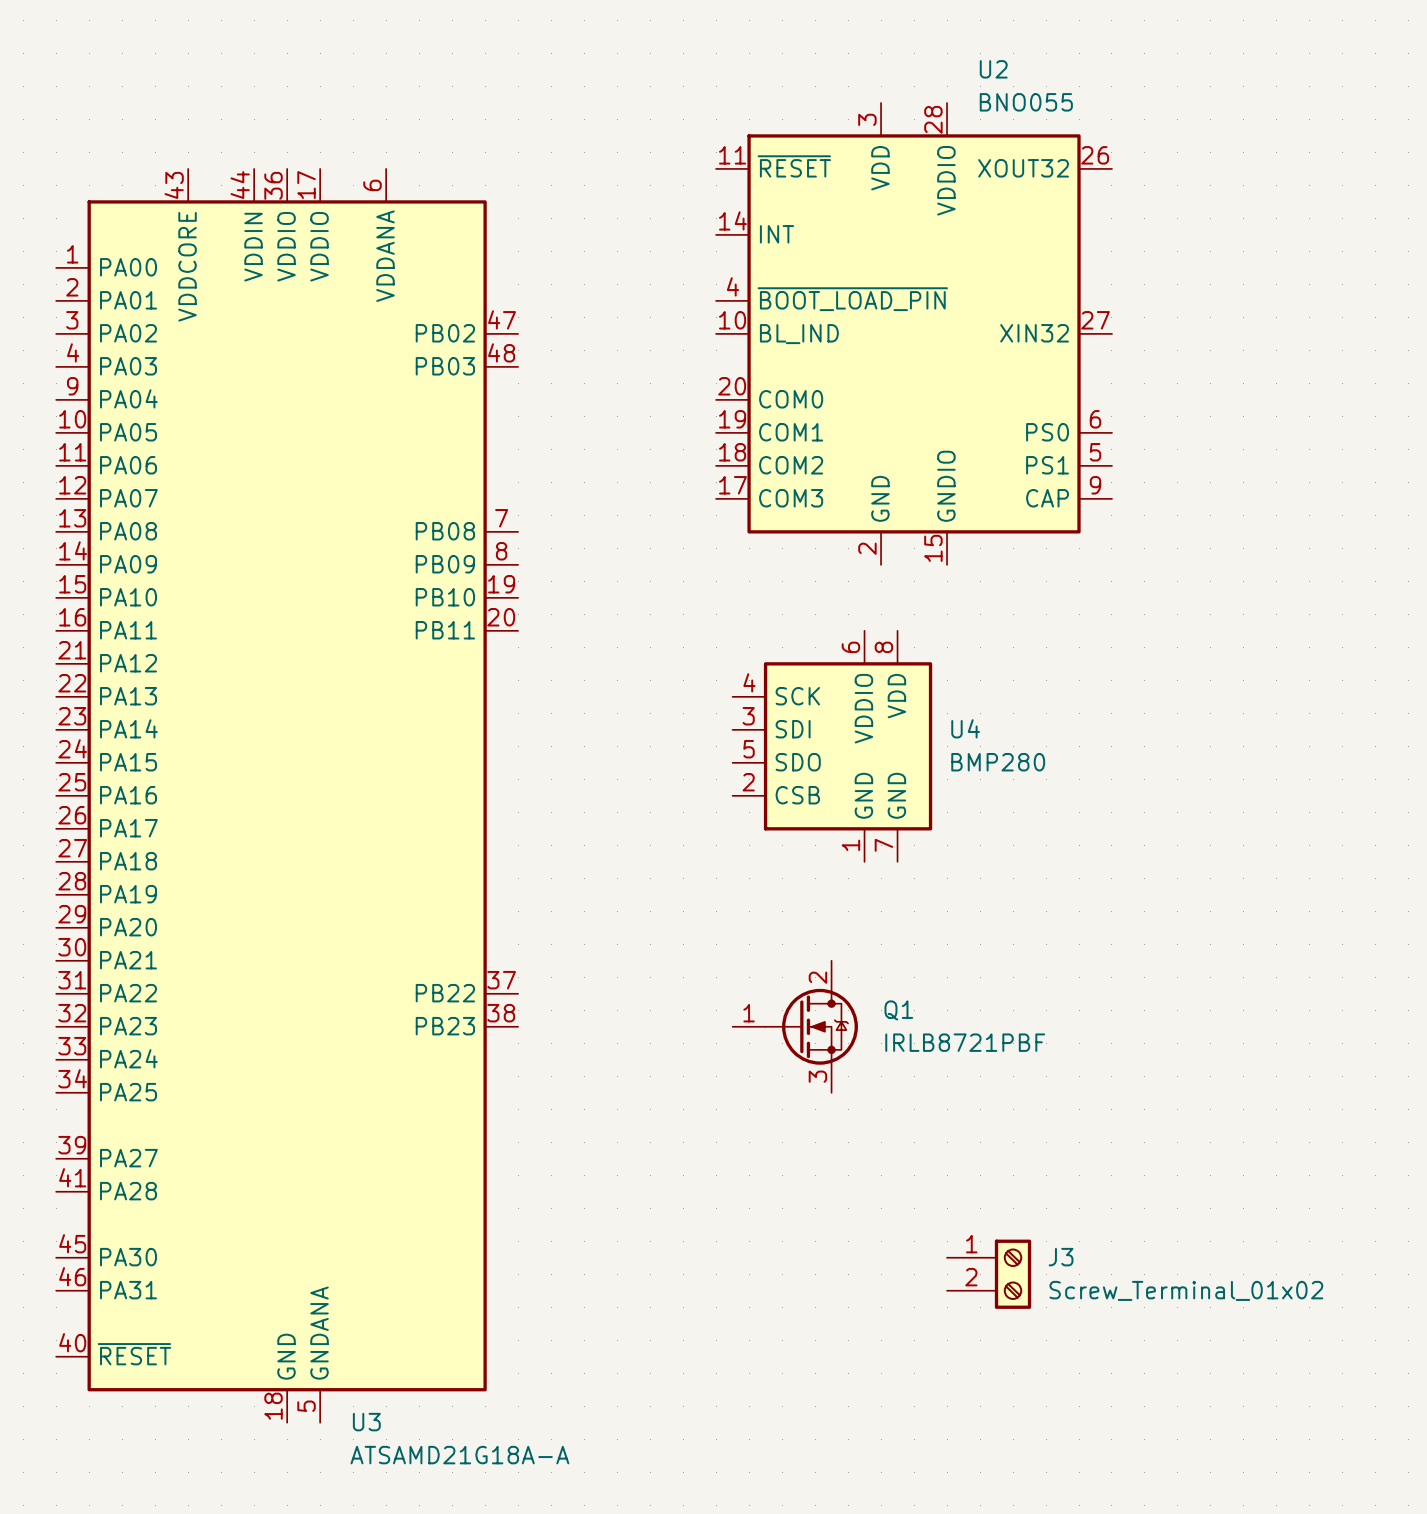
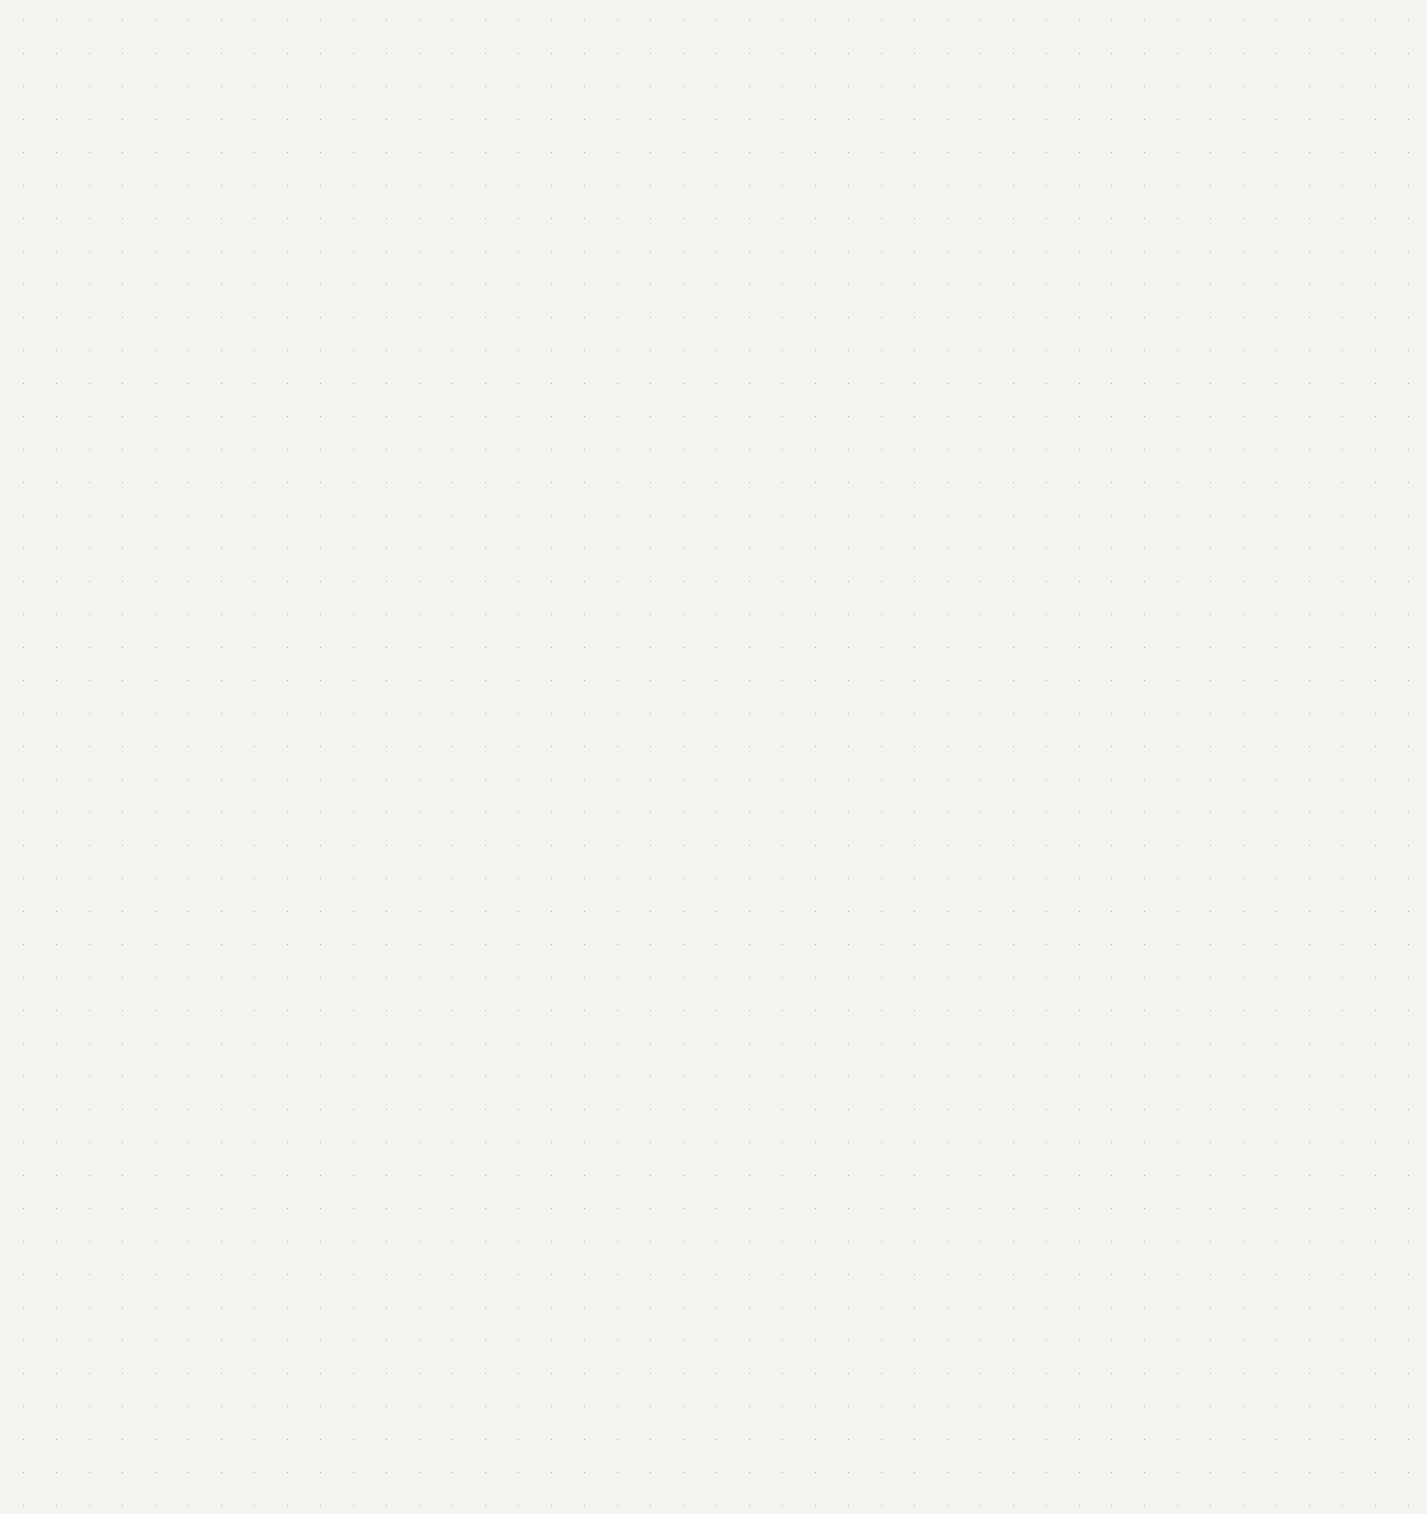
U2: BNO055 (914, 333) -> none
U4: BMP280 (832, 746) -> none
U3: ATSAMD21G18A-A (287, 795) -> none
Q1: IRLB8721PBF (795, 1026) -> none
J3: Screw_Terminal_01x02 (989, 1274) -> none

